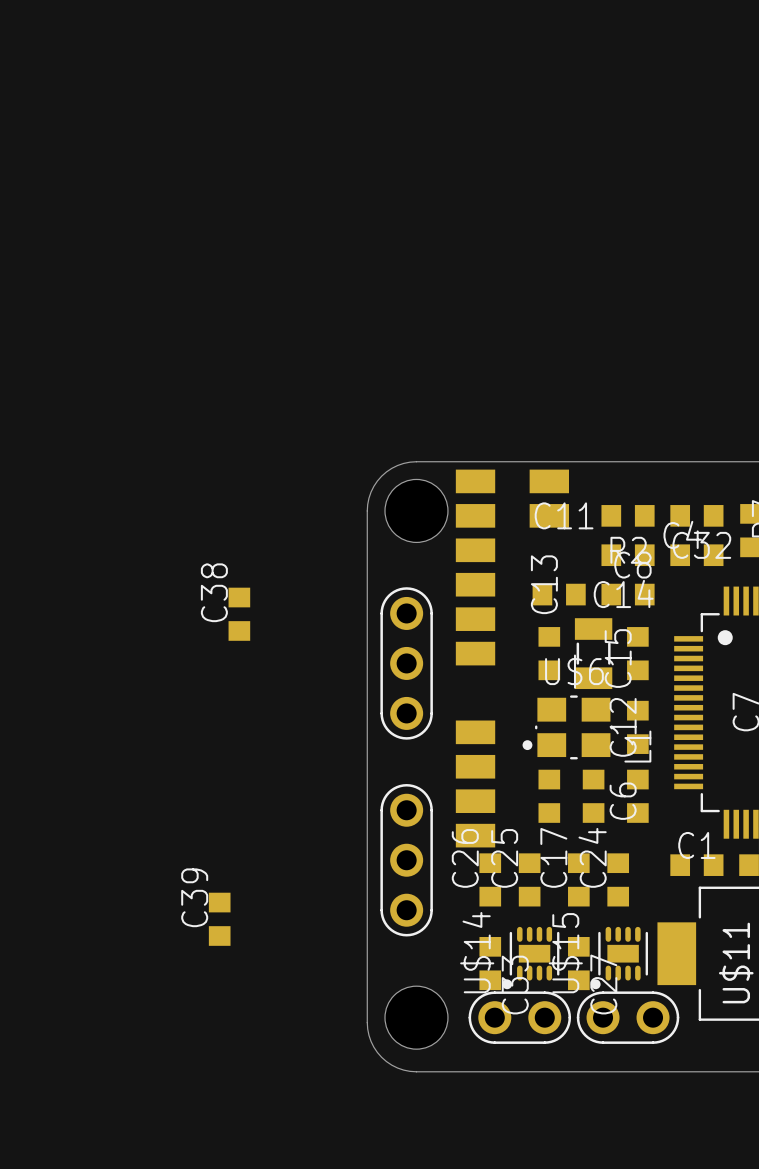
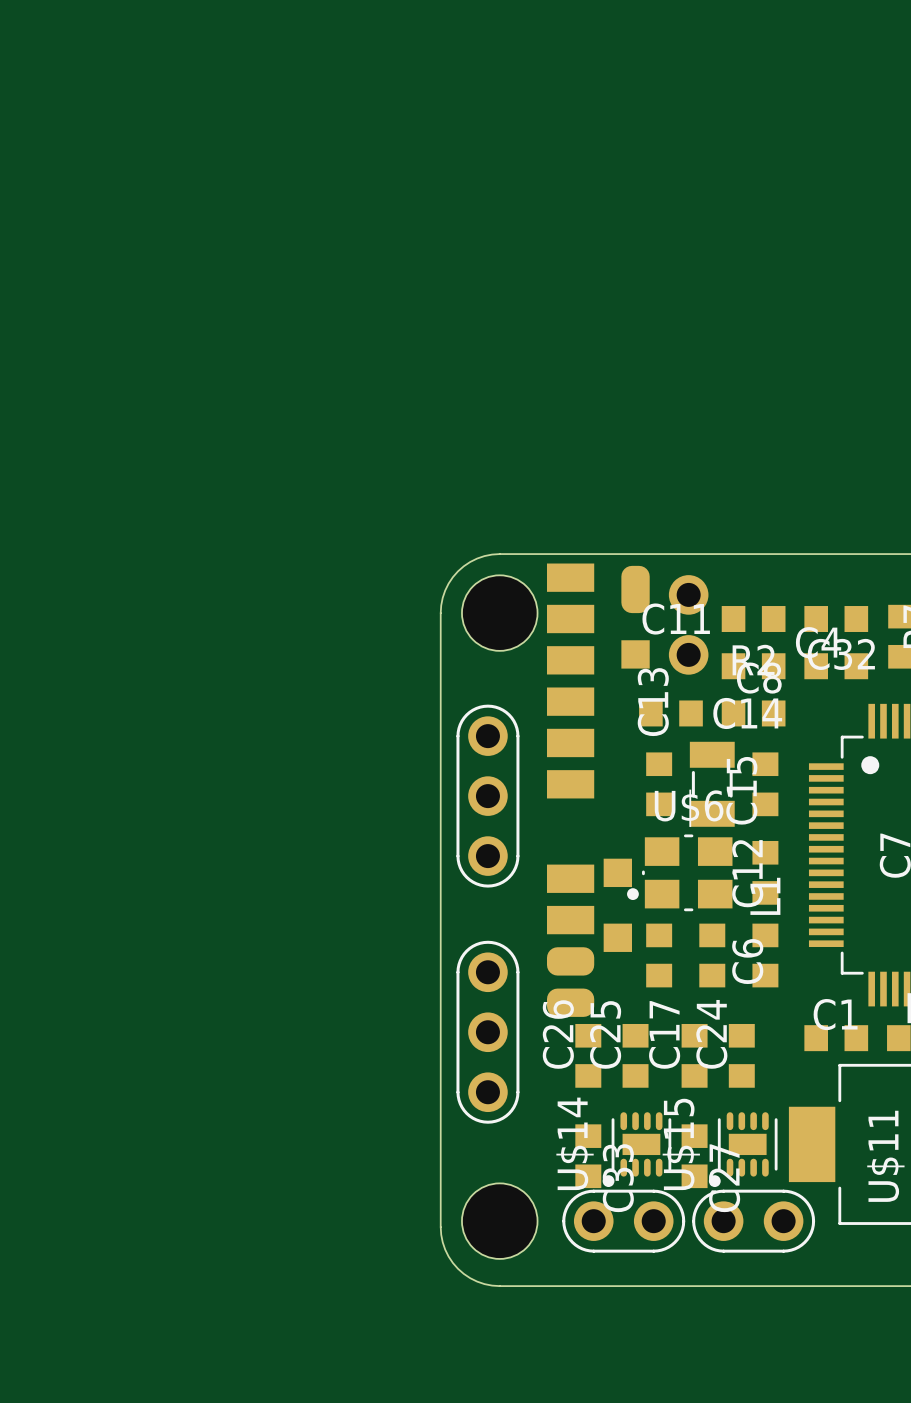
part: (549, 481) -> none
part: none -> (635, 589)
part: (549, 515) -> none
part: none -> (688, 624)
part: none -> (635, 654)
C38: (239, 614) -> none
part: none -> (617, 872)
part: none -> (617, 937)
part footprint: [455, 789, 496, 814] -> [546, 947, 595, 976]
part footprint: [455, 823, 496, 848] -> [546, 988, 595, 1017]
C39: (219, 919) -> none

